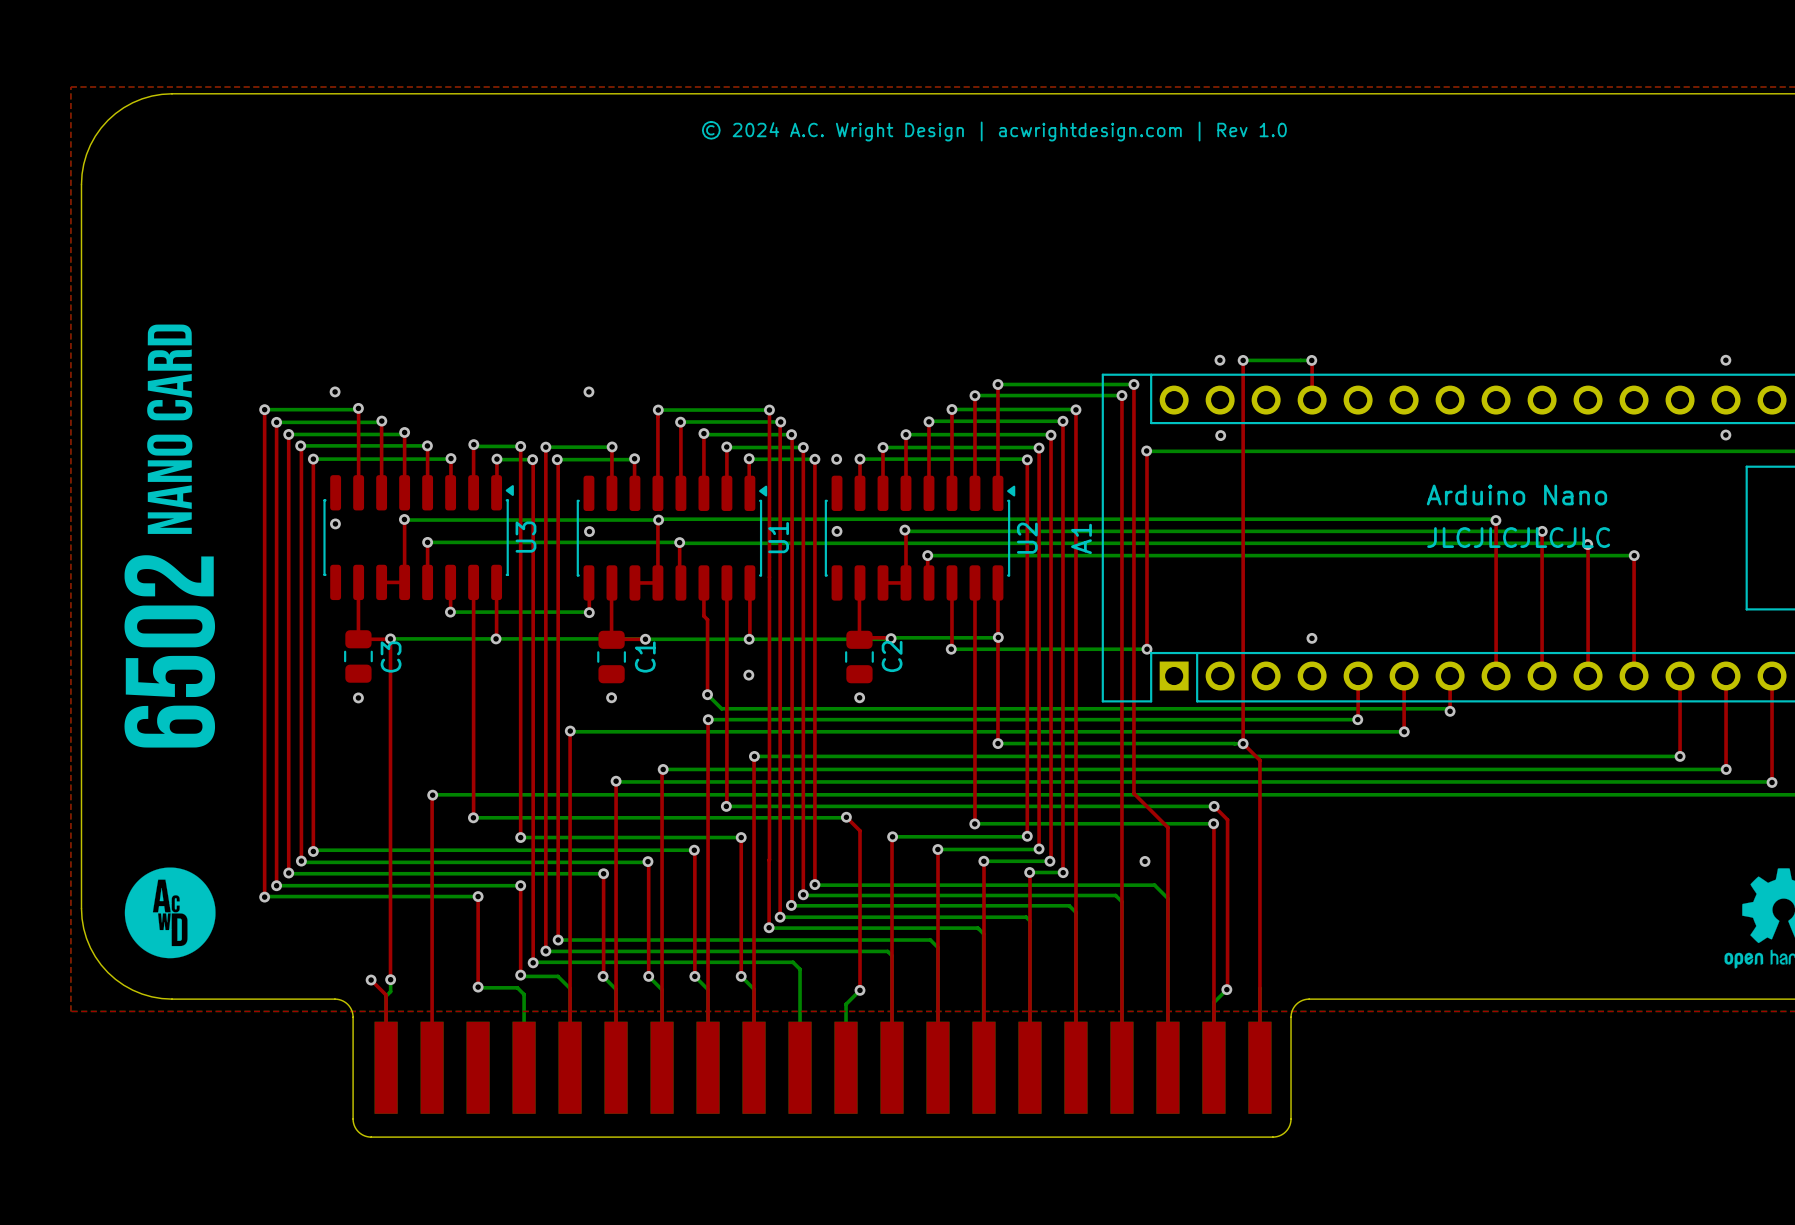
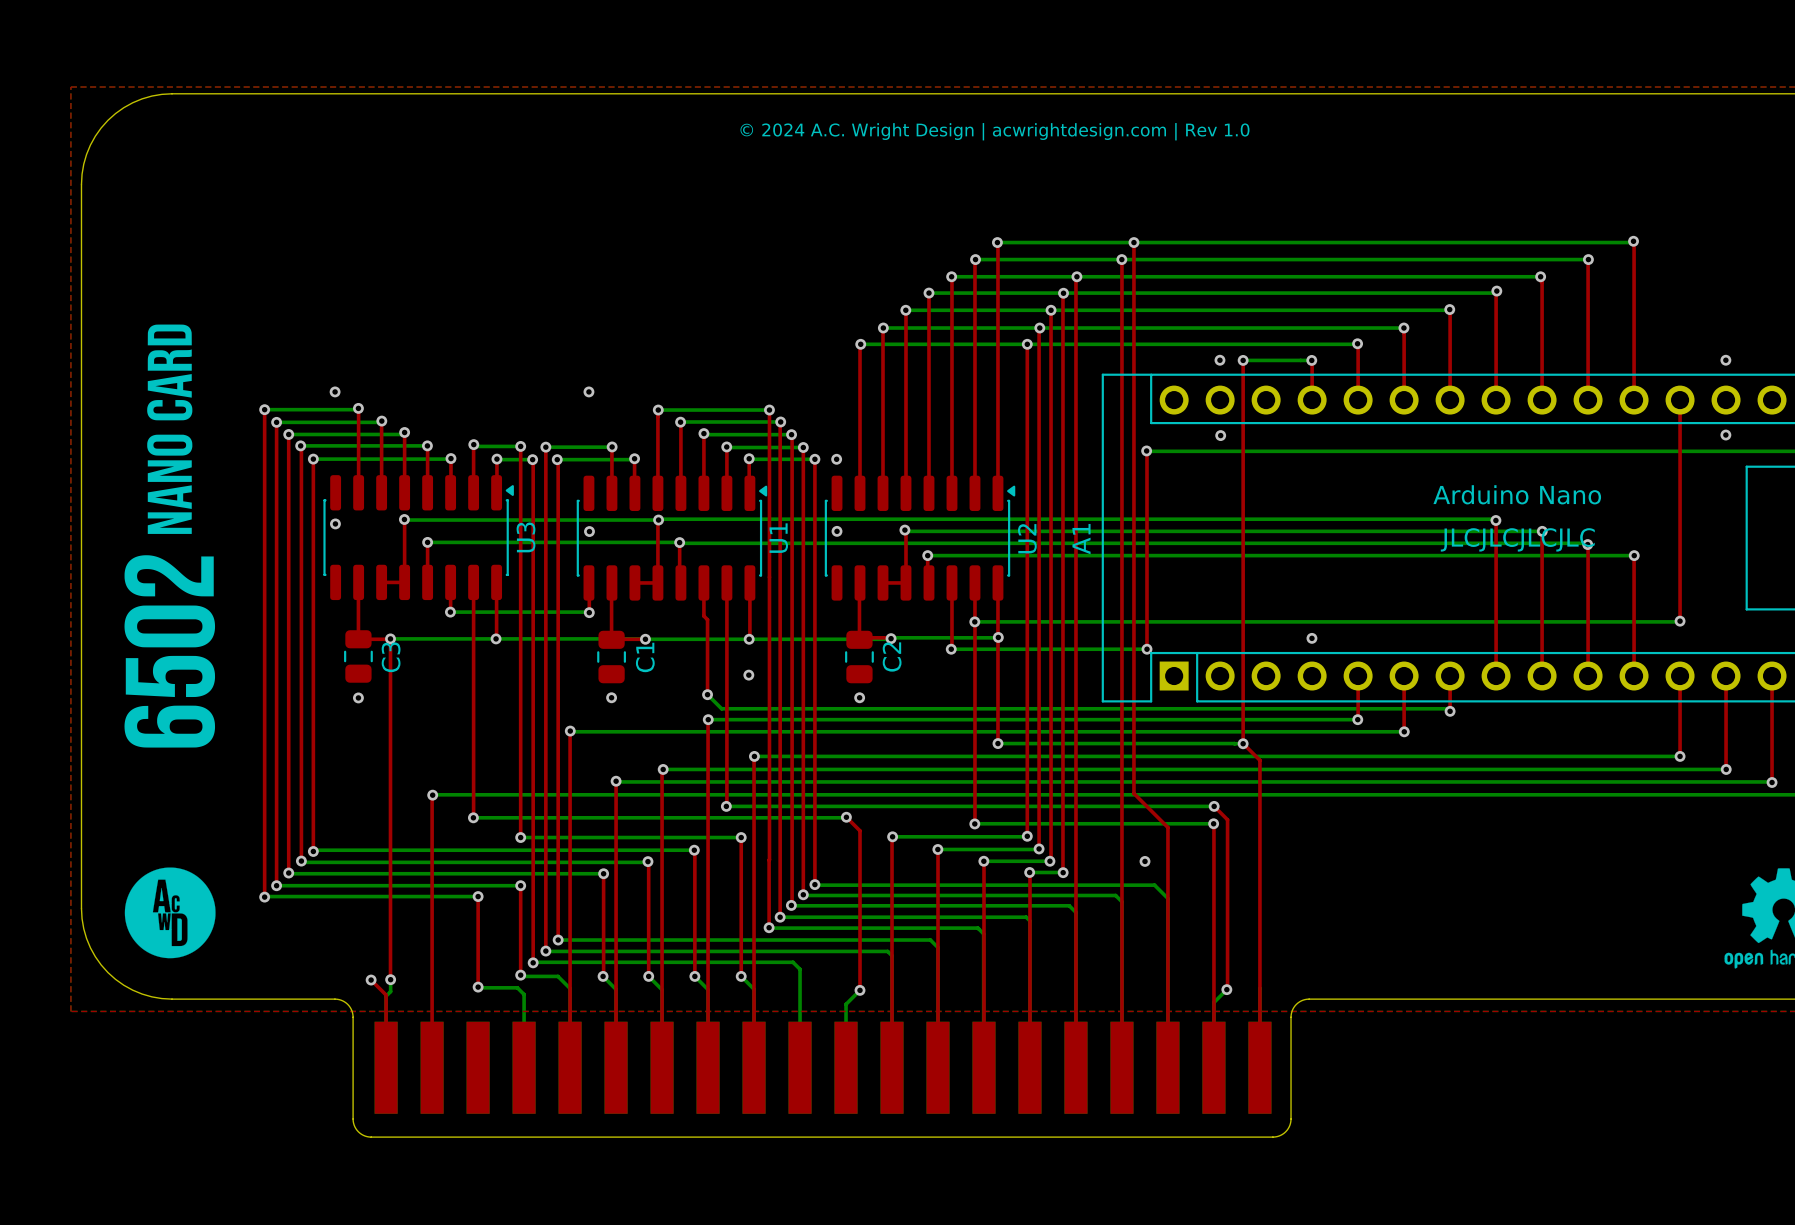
top track: none -> (1633, 241) (1634, 400)
bottom track: none -> (1633, 241) (997, 242)
via: none -> (1633, 241)
top track: none -> (997, 242) (997, 384)
via: none -> (997, 242)
top track: none -> (1133, 242) (1133, 384)
via: none -> (1133, 242)
top track: none -> (975, 259) (974, 395)
bottom track: none -> (975, 259) (1588, 259)
via: none -> (975, 259)
top track: none -> (1121, 259) (1121, 395)
via: none -> (1121, 259)
top track: none -> (1588, 259) (1588, 400)
via: none -> (1588, 259)
top track: none -> (951, 276) (951, 409)
bottom track: none -> (951, 276) (1540, 276)
via: none -> (951, 276)
top track: none -> (1076, 276) (1075, 409)
via: none -> (1076, 276)
top track: none -> (1540, 276) (1542, 400)
via: none -> (1540, 276)
top track: none -> (1496, 291) (1496, 400)
bottom track: none -> (1496, 291) (1494, 293) (1063, 293)
via: none -> (1496, 291)
top track: none -> (928, 293) (928, 421)
bottom track: none -> (928, 293) (1063, 293)
via: none -> (928, 293)
top track: none -> (1063, 293) (1062, 421)
via: none -> (1063, 293)
top track: none -> (1449, 309) (1450, 400)
bottom track: none -> (1449, 309) (905, 310)
via: none -> (1449, 309)
top track: none -> (905, 310) (905, 434)
via: none -> (905, 310)
top track: none -> (1051, 310) (1051, 435)
via: none -> (1051, 310)
top track: none -> (883, 328) (883, 447)
bottom track: none -> (883, 328) (1403, 328)
via: none -> (883, 328)
top track: none -> (1039, 328) (1039, 448)
via: none -> (1039, 328)
via: none -> (1403, 328)
top track: none -> (1404, 333) (1404, 400)
top track: none -> (1357, 343) (1358, 400)
bottom track: none -> (1357, 343) (860, 344)
via: none -> (1357, 343)
top track: none -> (860, 344) (860, 459)
via: none -> (860, 344)
top track: none -> (1027, 344) (1027, 459)
via: none -> (1027, 344)
bottom track: (997, 384) (1133, 384) -> none
via: (997, 384) -> none
via: (1133, 384) -> none
via: (974, 395) -> none
bottom track: (975, 395) (1121, 395) -> none
via: (1121, 395) -> none
top track: none -> (1680, 400) (1680, 621)
bottom track: (951, 409) (1075, 409) -> none
via: (951, 409) -> none
via: (1075, 409) -> none
via: (928, 421) -> none
bottom track: (1062, 421) (928, 421) -> none
via: (1062, 421) -> none
bottom track: (905, 434) (1051, 435) -> none
via: (905, 434) -> none
via: (1051, 435) -> none
bottom track: (883, 447) (1039, 448) -> none
via: (883, 447) -> none
via: (1039, 448) -> none
bottom track: (860, 459) (1027, 459) -> none
via: (860, 459) -> none
via: (1027, 459) -> none
via: none -> (974, 621)
bottom track: none -> (1680, 621) (974, 621)
via: none -> (1680, 621)

